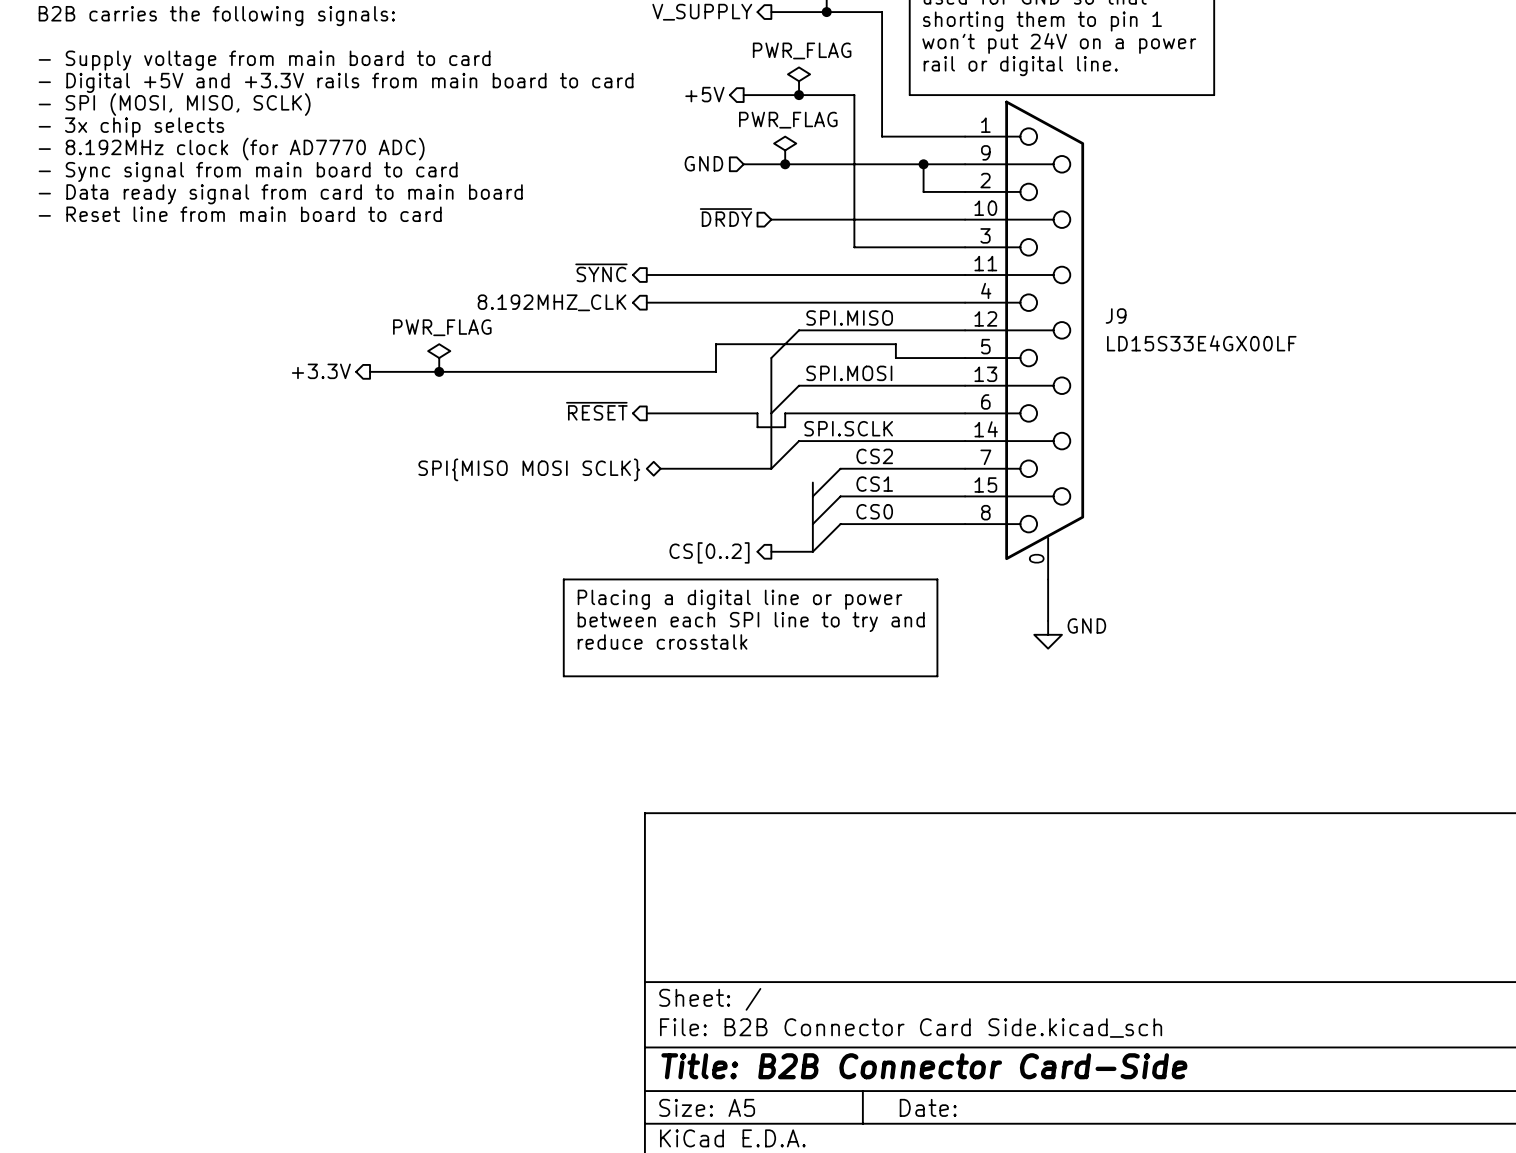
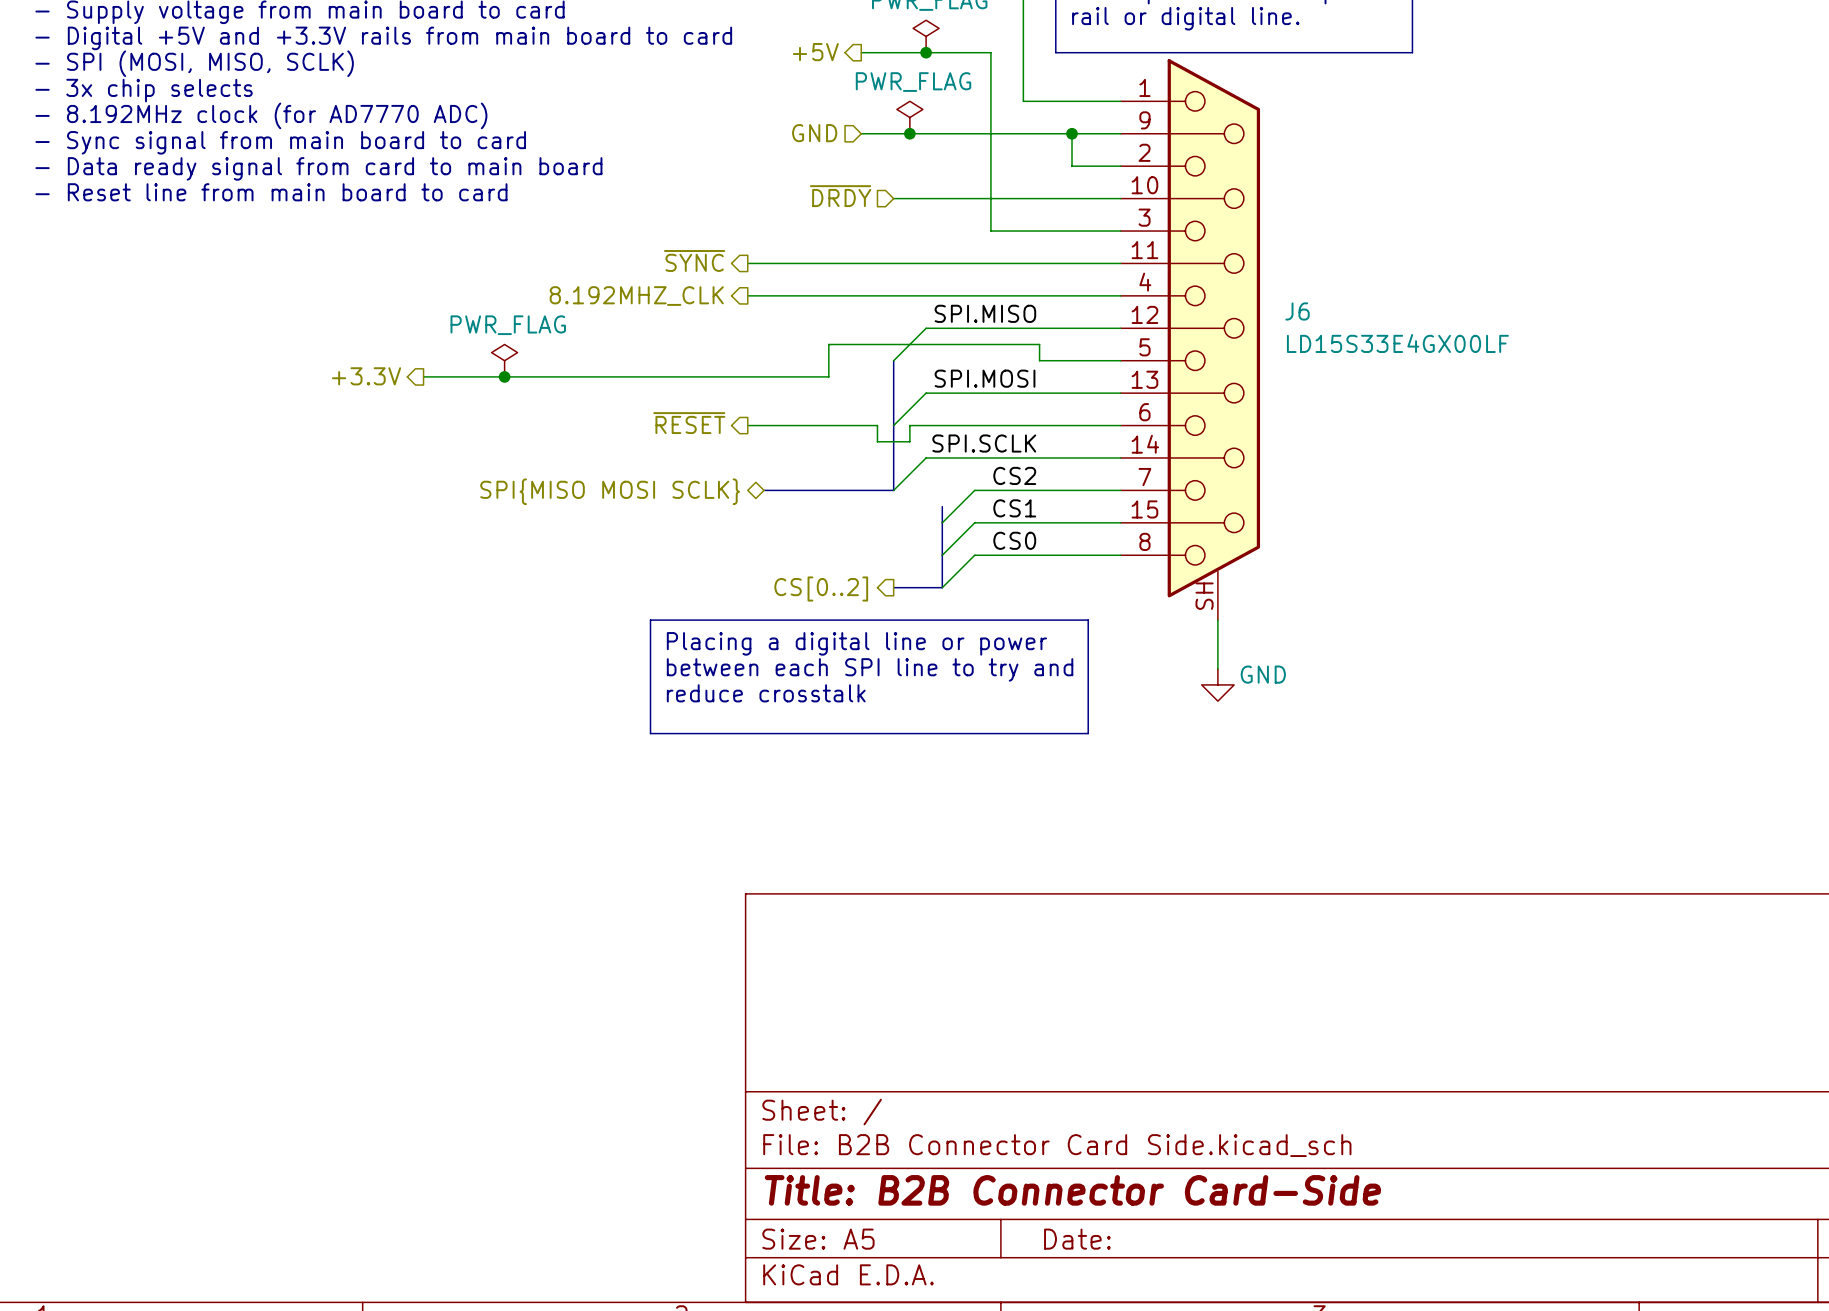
J9 name: J9 (1116, 316) -> J6 (1297, 311)
J9 pin number: 0 (1036, 558) -> SH (1204, 596)

